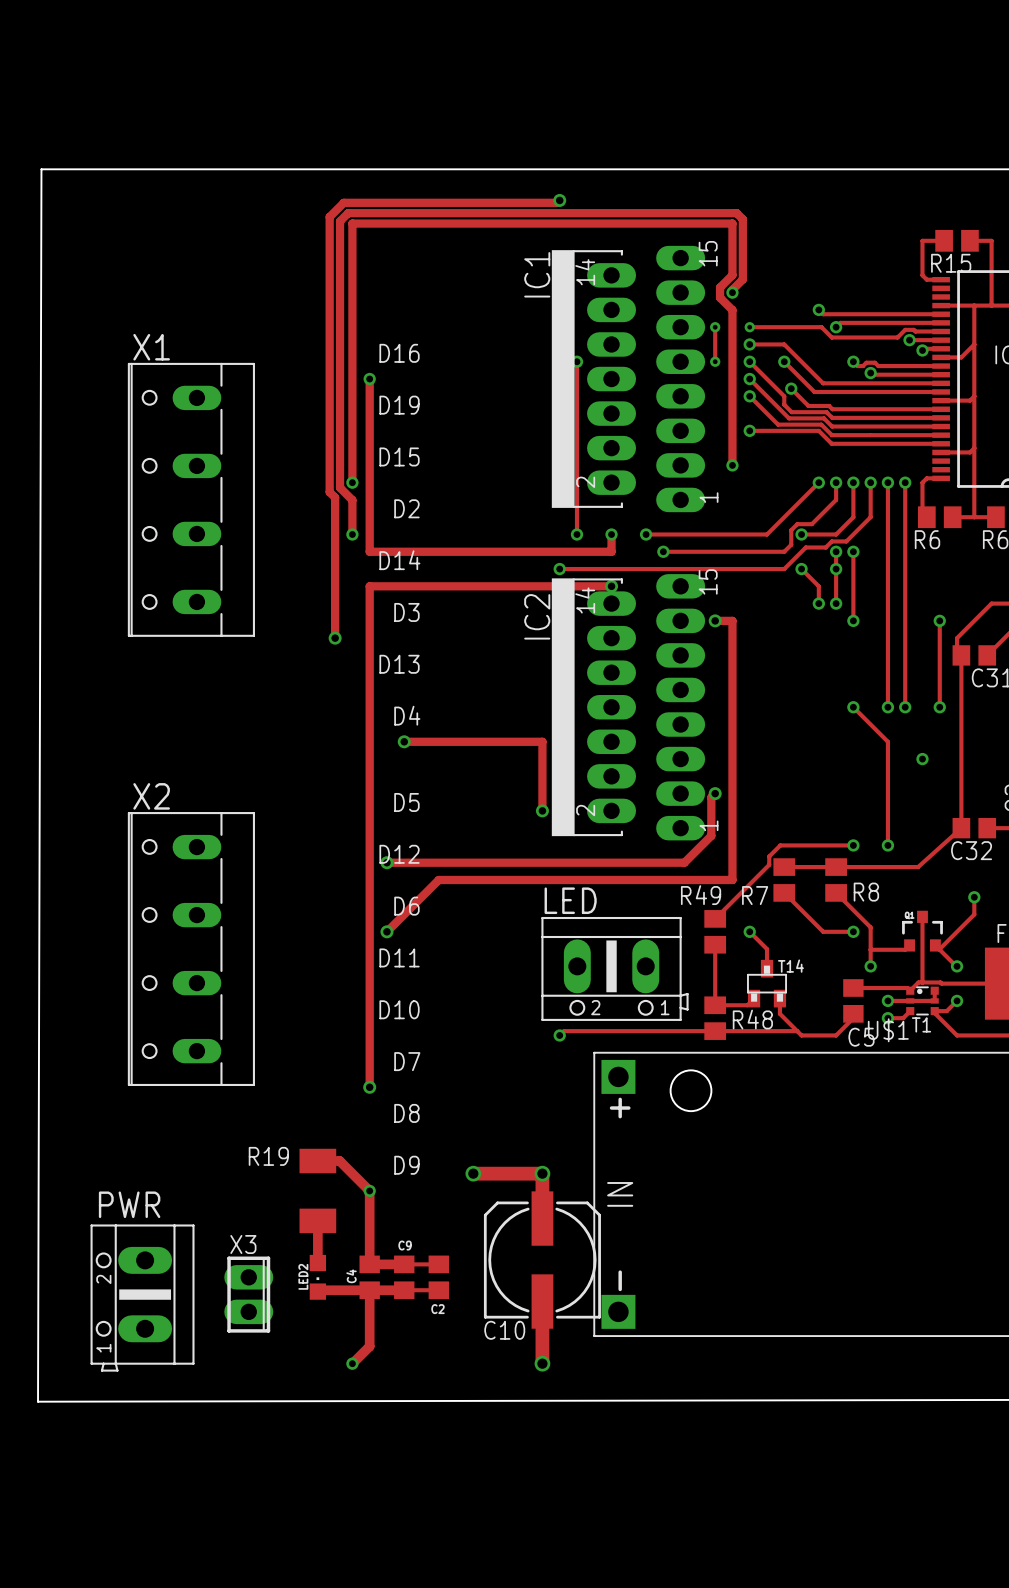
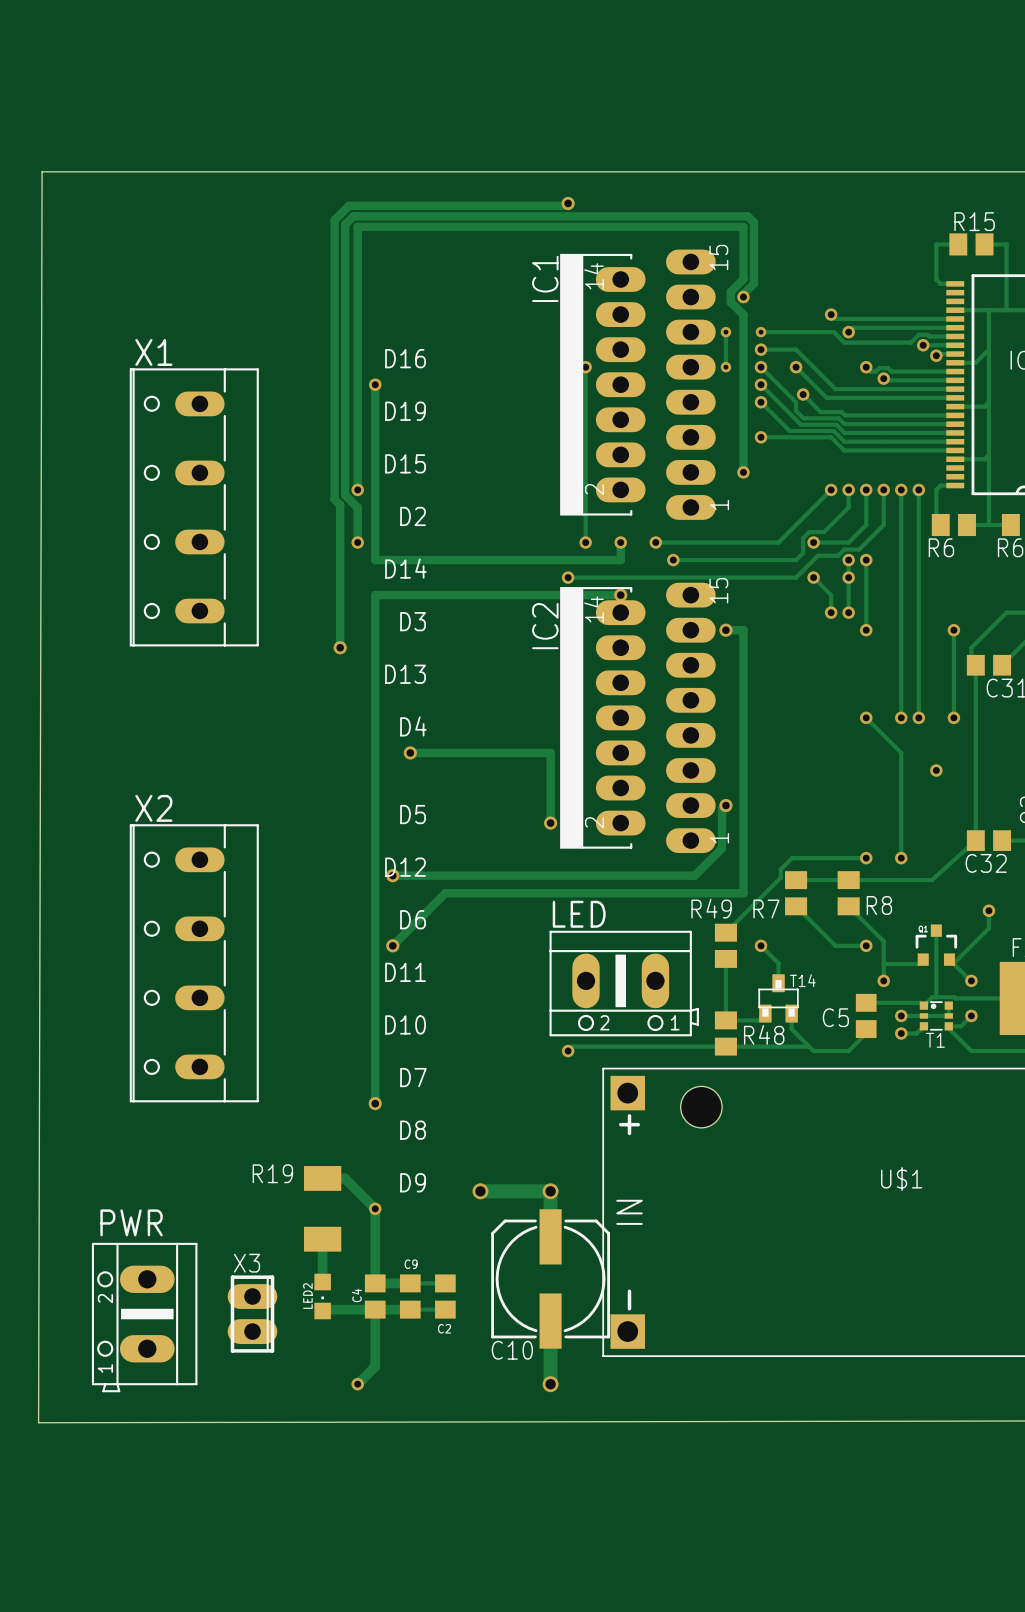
R15 name position: R15 (951, 263) -> R15 (974, 221)
U$1 name position: U$1 (888, 1030) -> U$1 (901, 1179)
C5 name position: C5 (861, 1037) -> C5 (835, 1017)

